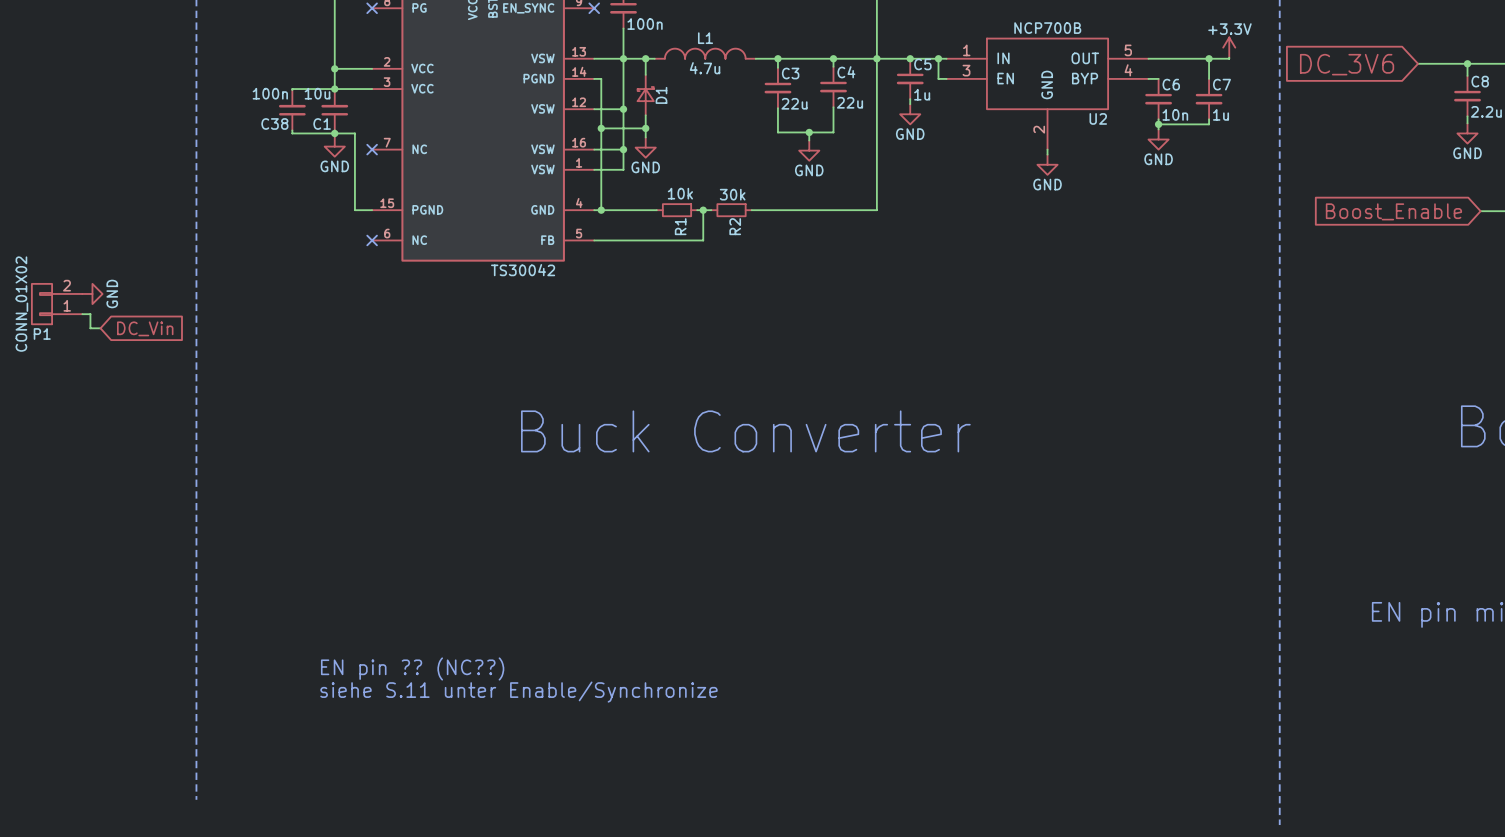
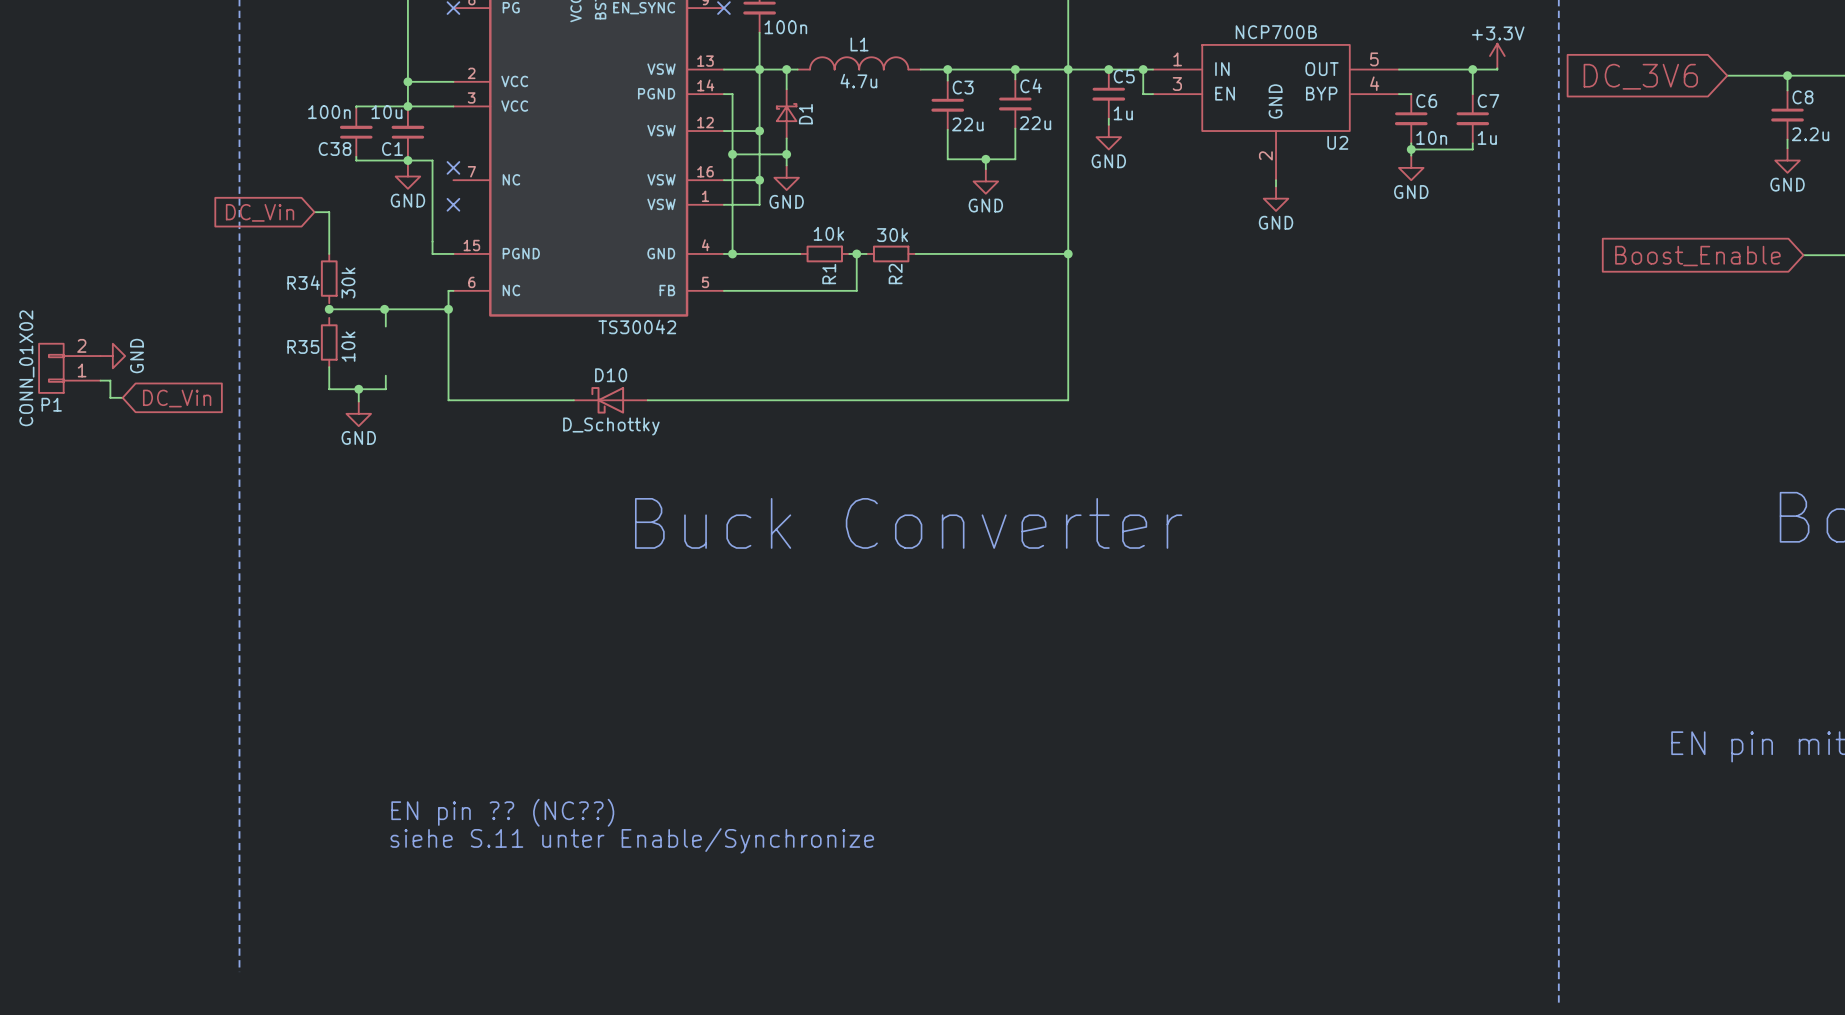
no-connect mark: none -> (453, 167)
no-connect mark: (372, 149) -> none
no-connect mark: none -> (453, 204)
wire: none -> (314, 212) (329, 212) (329, 253)
global label: none -> DC_Vin (260, 212)
wire: none -> (1068, 253) (1068, 400) (647, 400)
junction: none -> (1068, 253)
R34: none -> 30k (329, 278)
wire: none -> (453, 290) (448, 290) (448, 400) (573, 400)
no-connect mark: (372, 240) -> none
wire: none -> (329, 309) (448, 309)
junction: none -> (329, 309)
junction: none -> (384, 309)
wire: none -> (385, 309) (385, 326)
junction: none -> (448, 309)
R35: none -> 10k (329, 342)
wire: none -> (329, 367) (329, 389) (385, 389) (385, 375)
wire: none -> (358, 389) (358, 401)
junction: none -> (358, 389)
D10: none -> D_Schottky (610, 400)
power symbol: none -> GND (358, 413)

